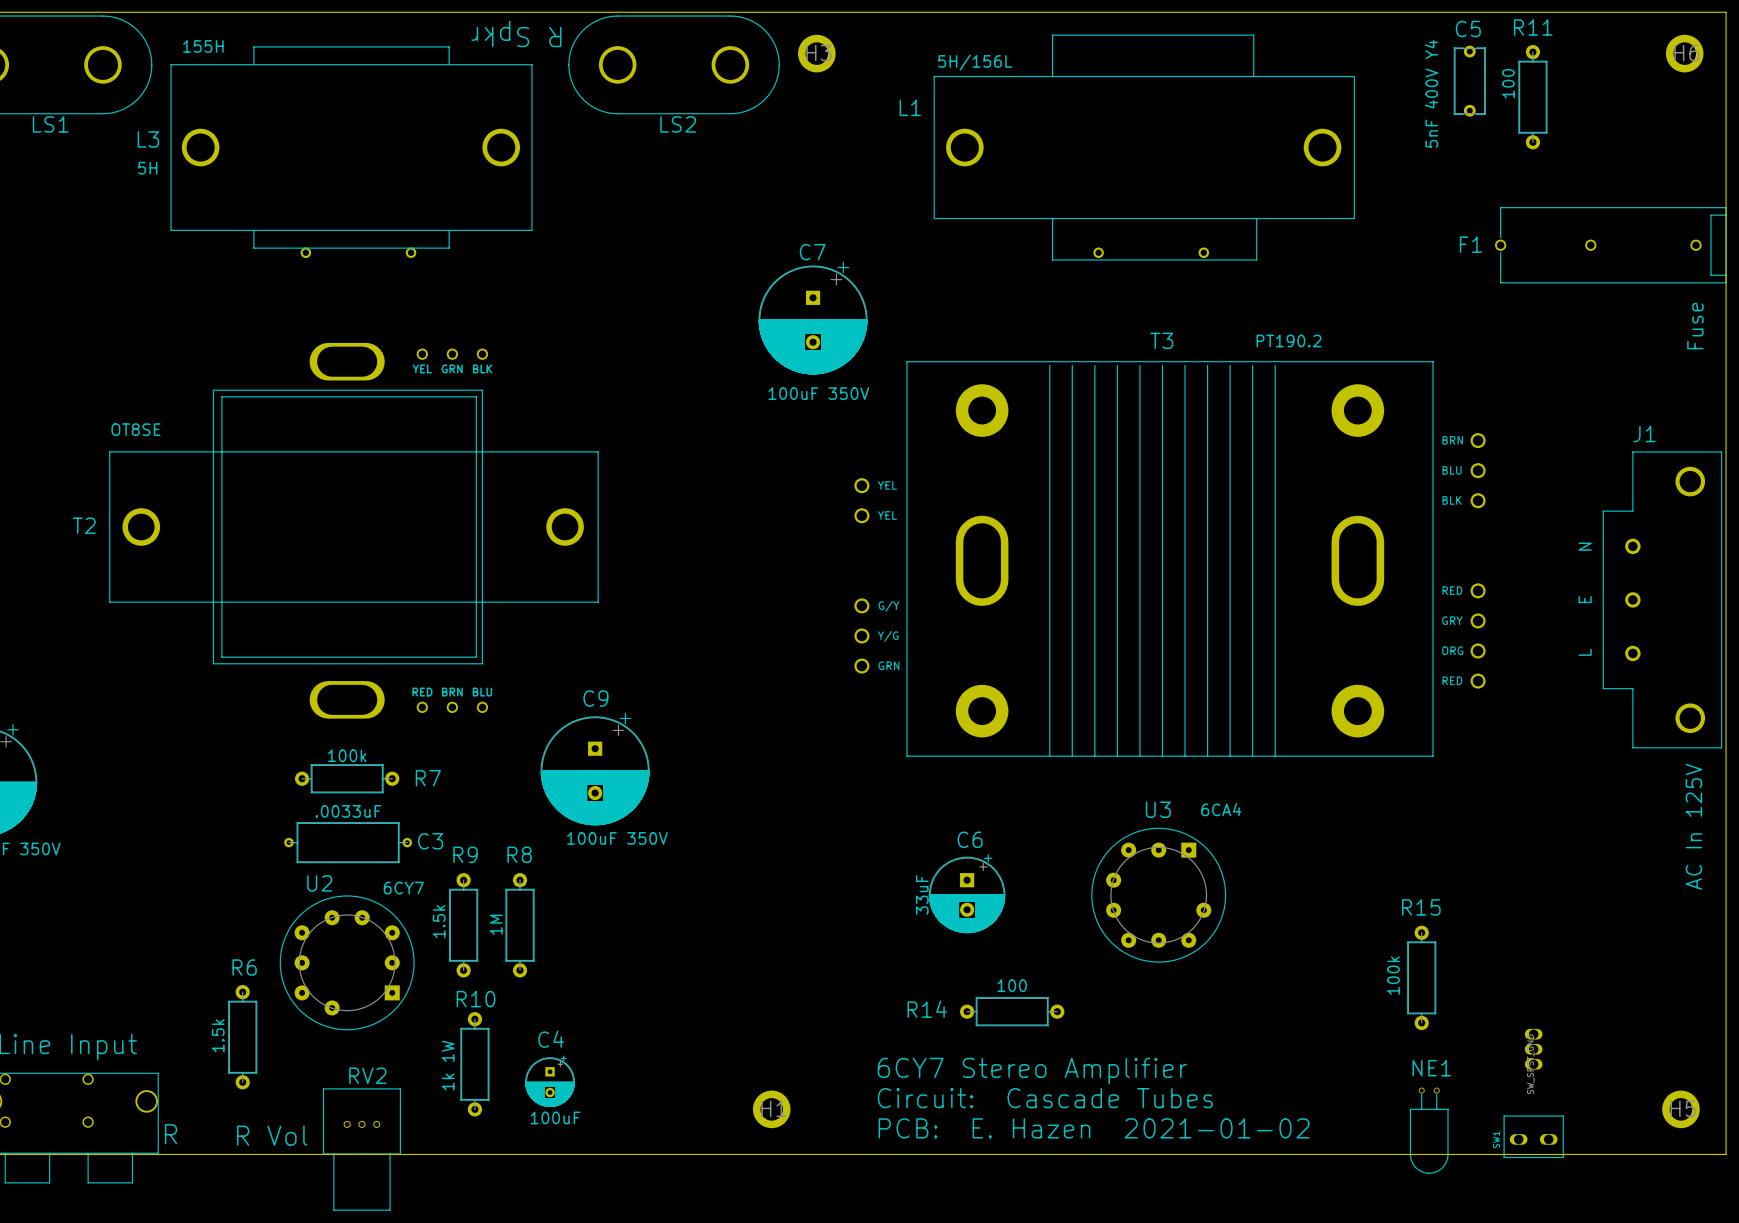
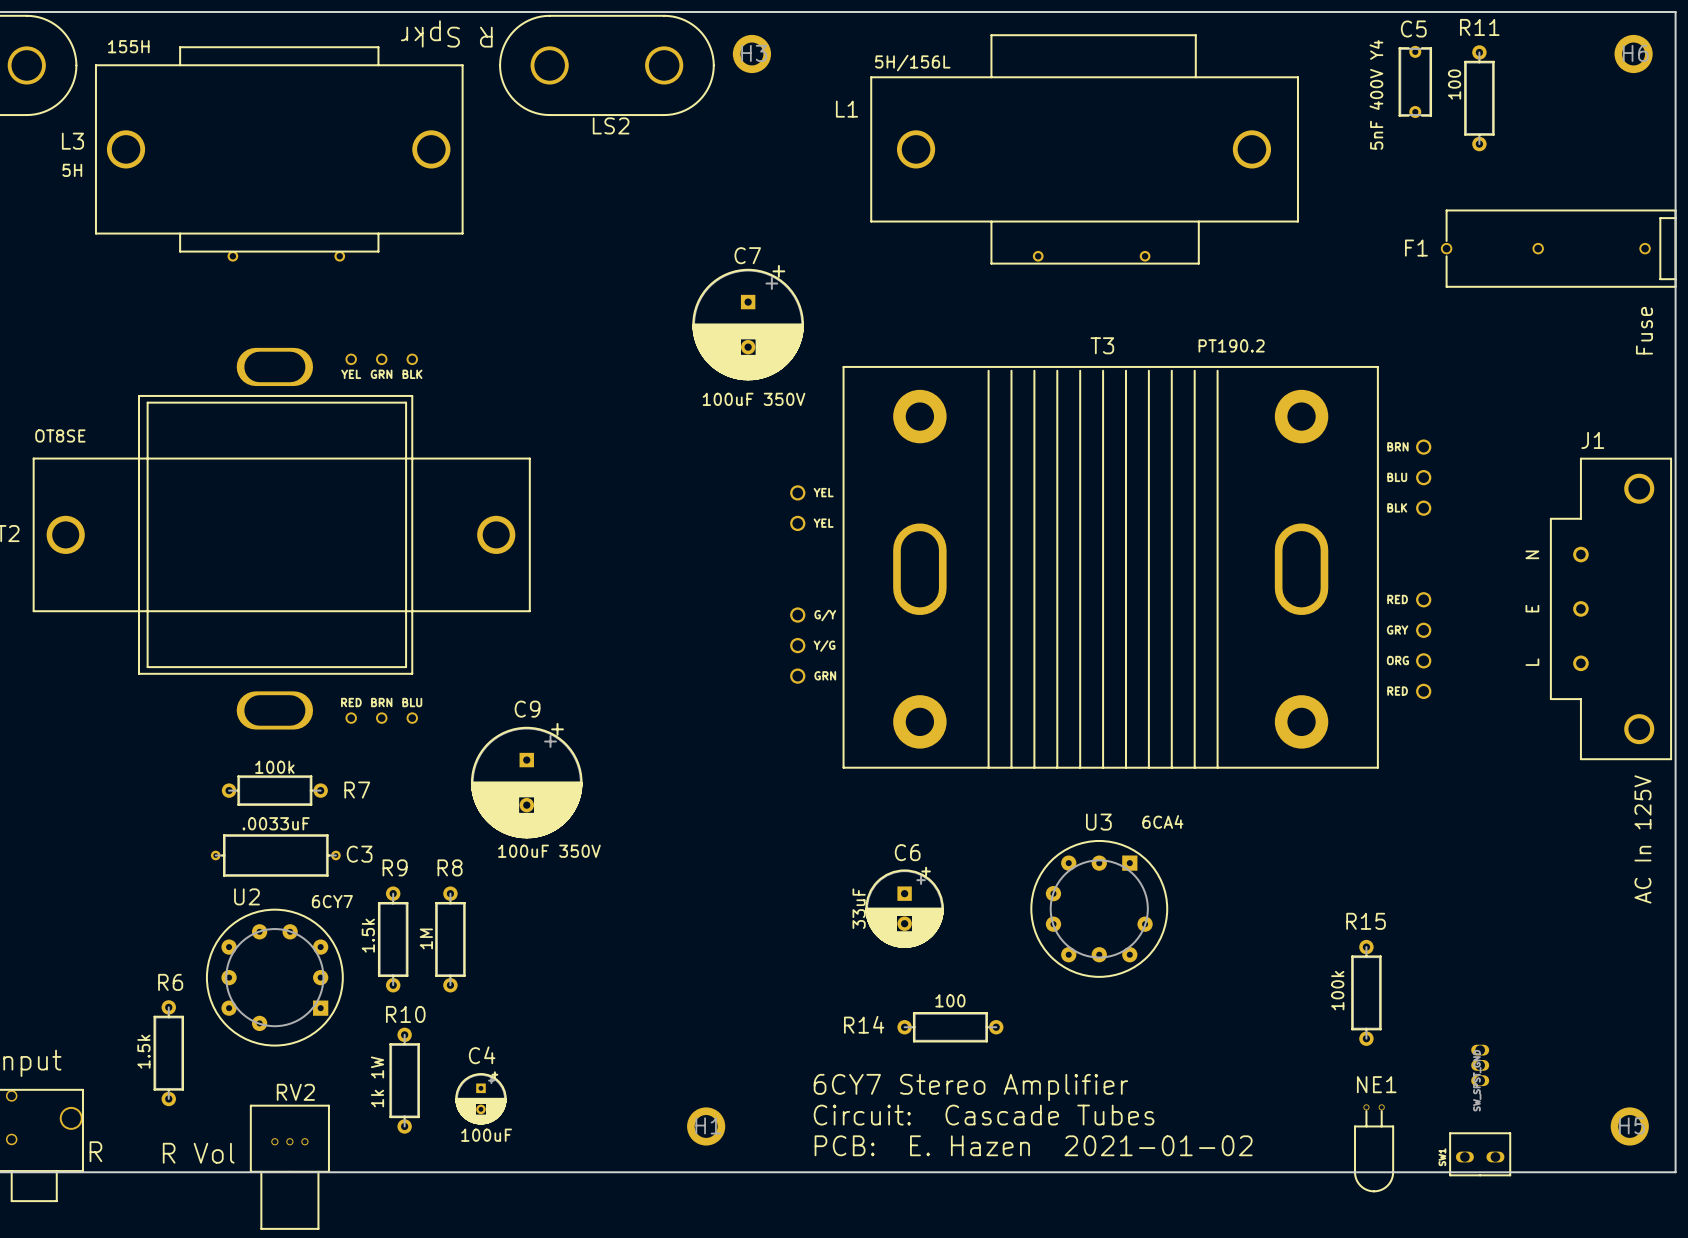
L1 footprint: [933, 34, 1355, 261] -> [870, 34, 1299, 264]

